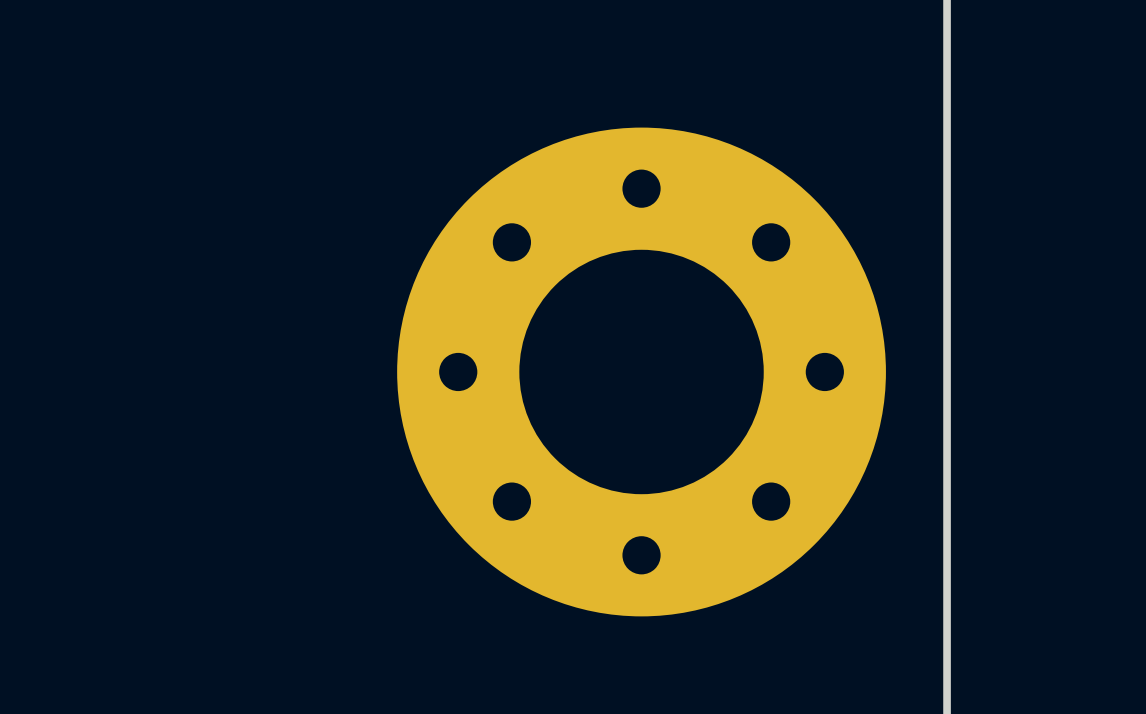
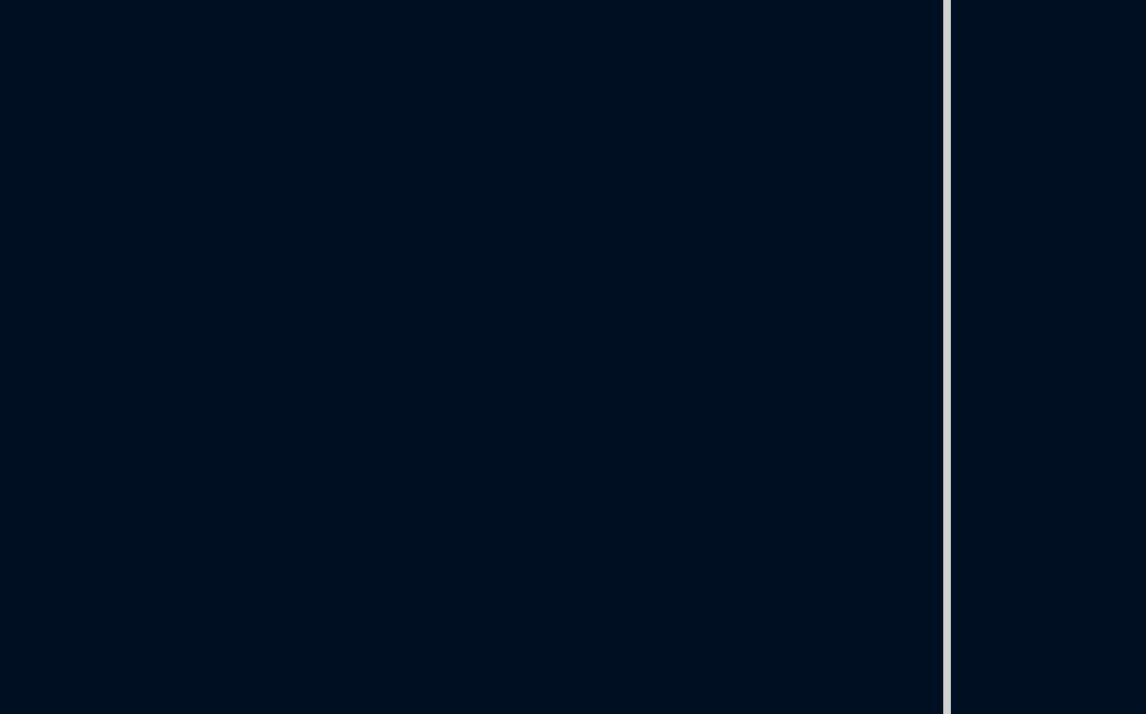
part: (641, 371) -> none

